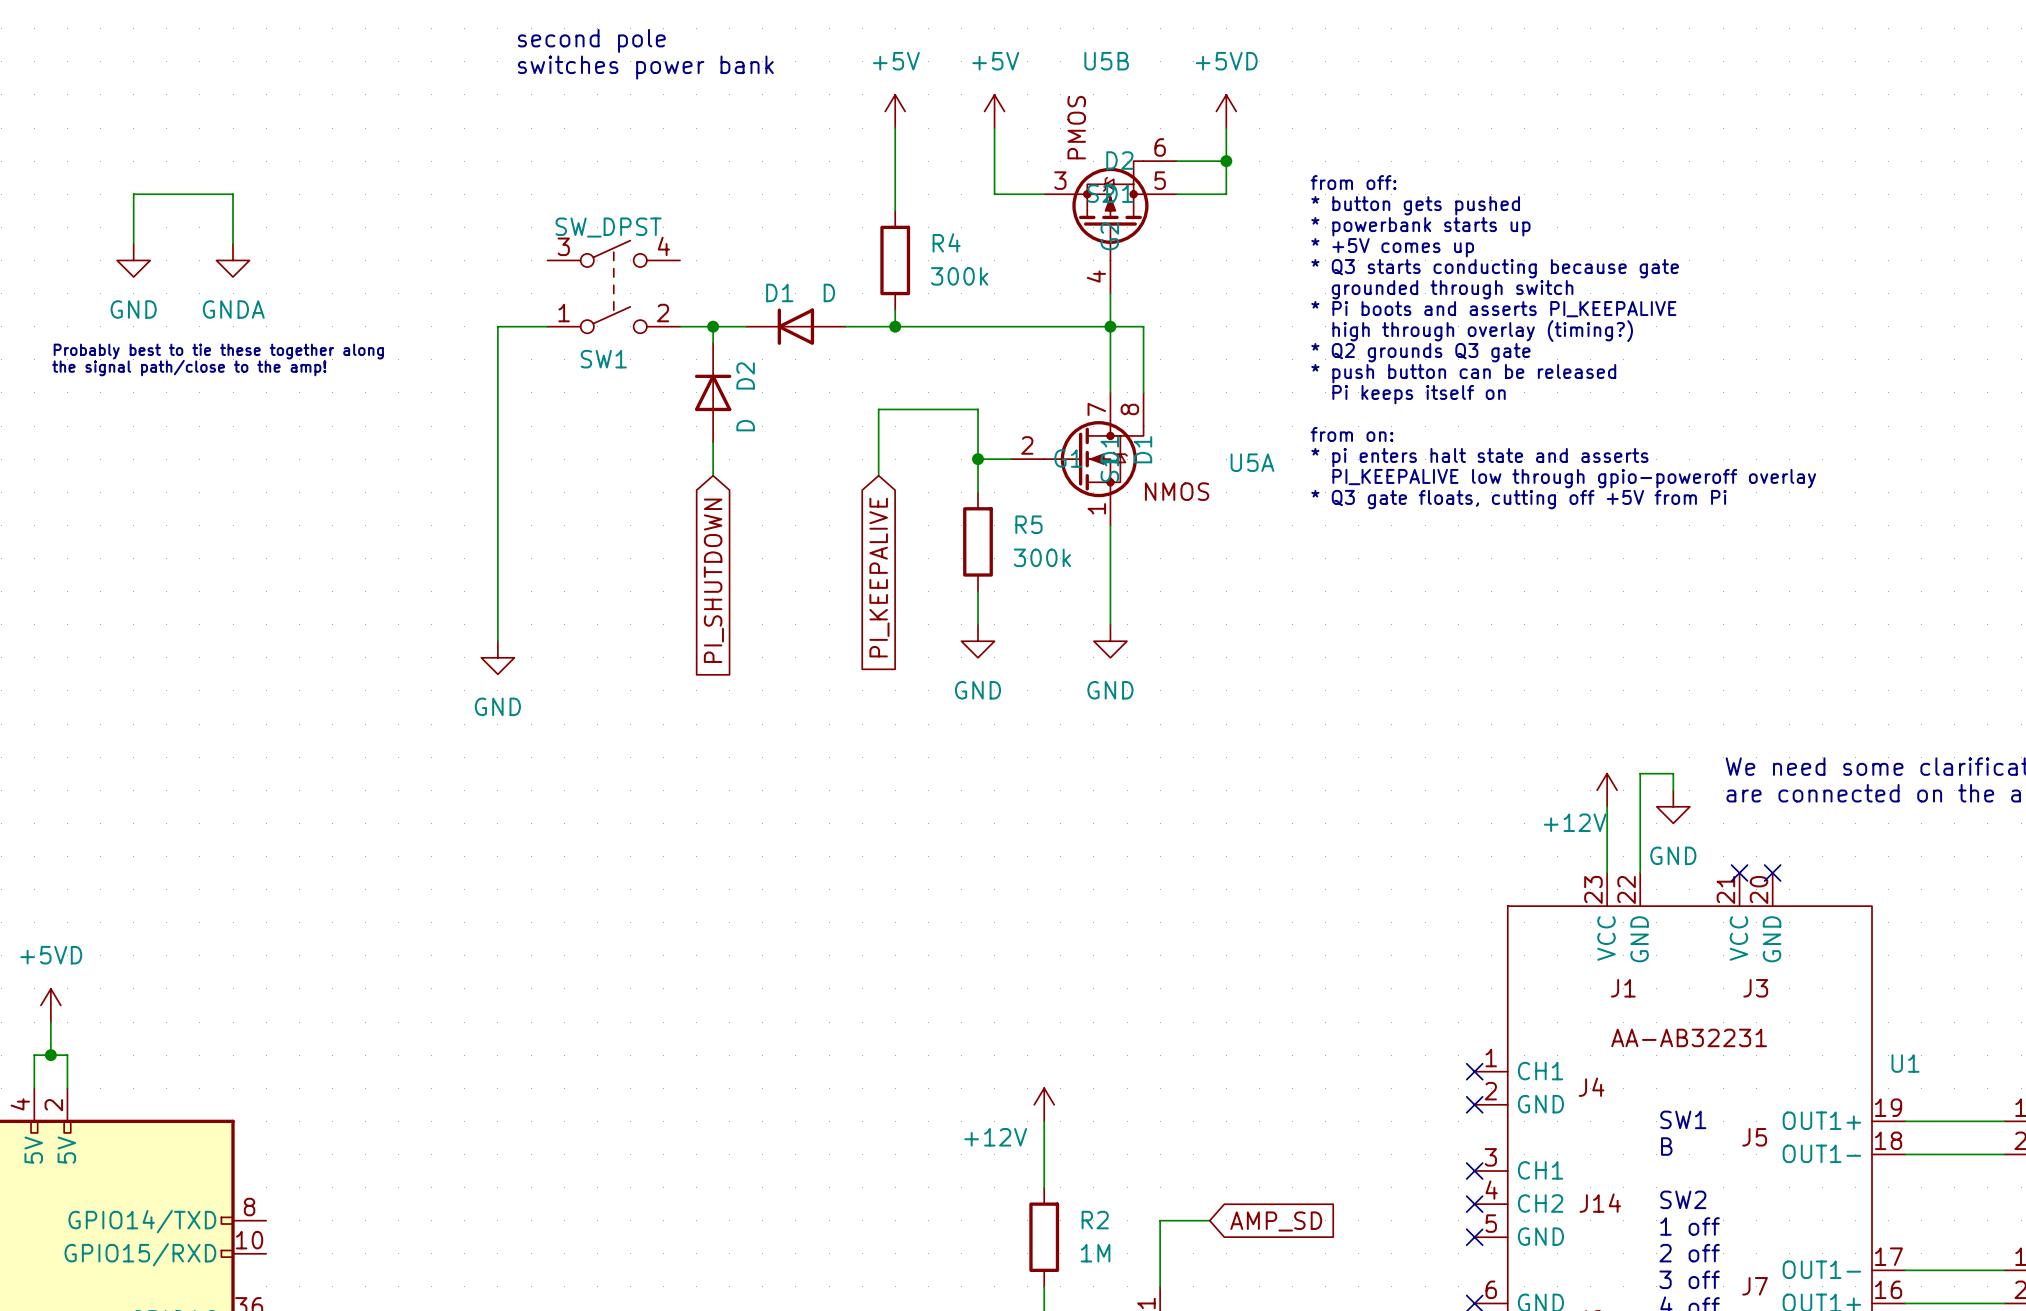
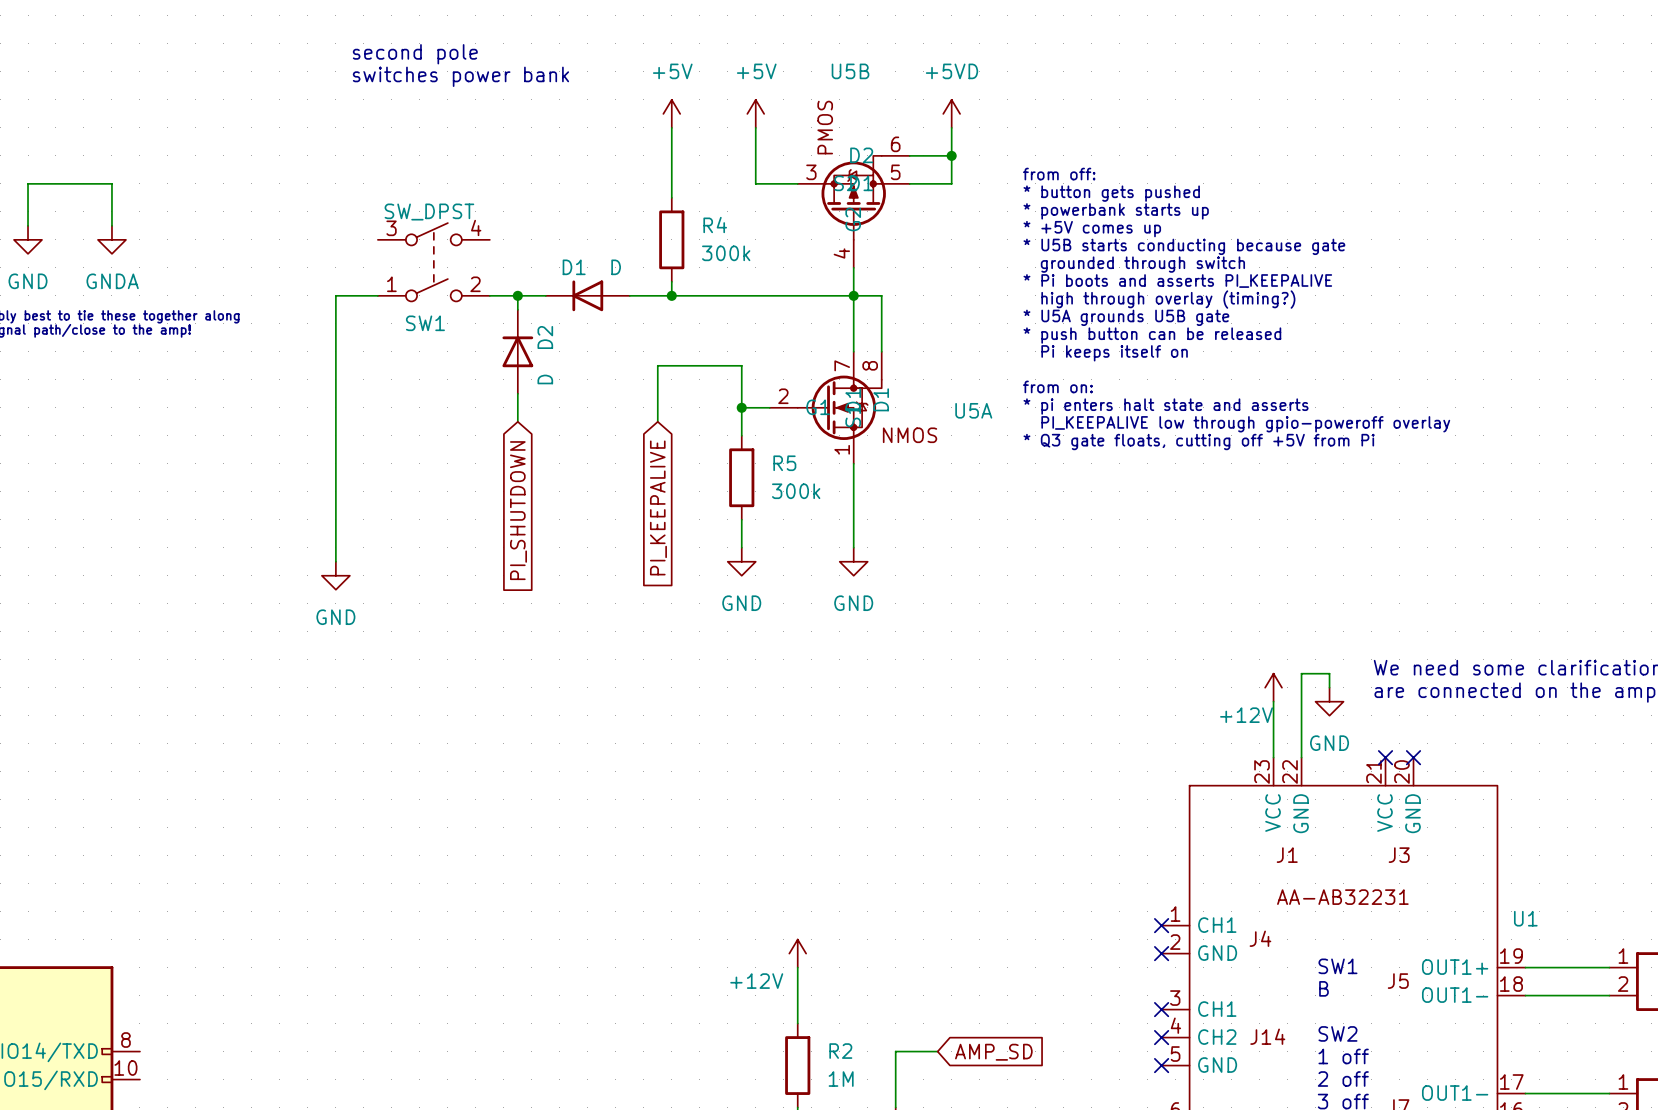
text: * Q3 starts conducting because gate (1495, 268) -> * U5B starts conducting because gate (1184, 246)
text: * Q2 grounds Q3 gate (1420, 352) -> * U5A grounds U5B gate (1126, 317)

